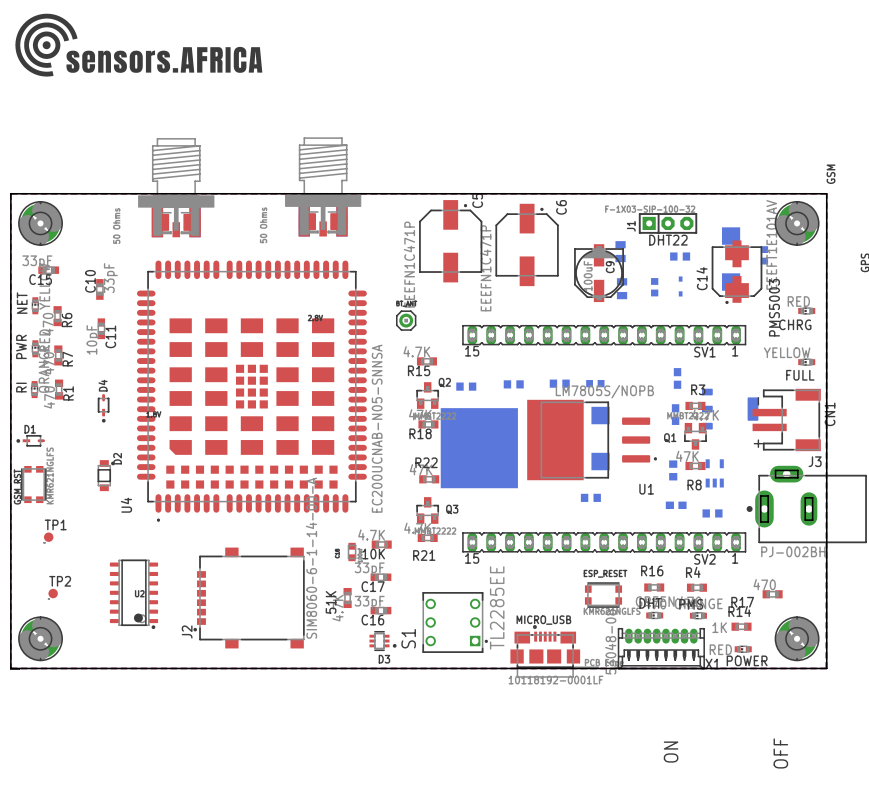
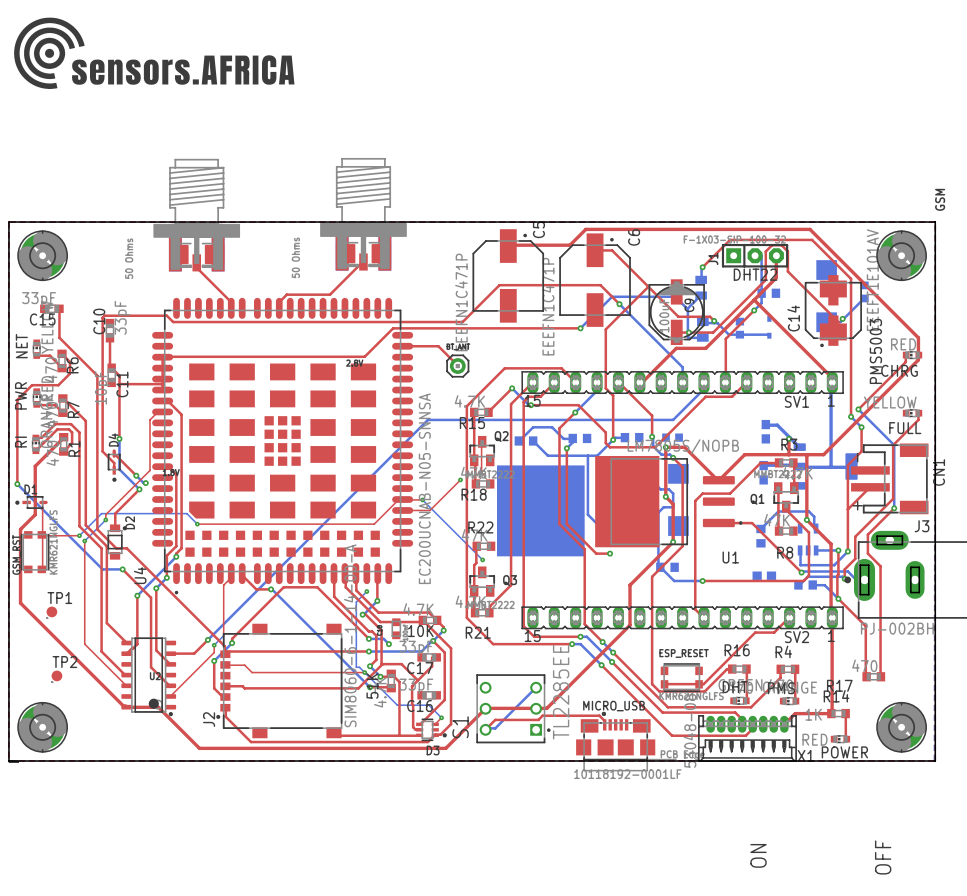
top track: none -> (508, 246) (570, 245) (585, 229) (810, 229) (918, 337) (918, 359) (823, 454) (744, 454) (718, 480) (684, 447) (665, 447) (665, 496) (673, 504) (673, 542) (630, 585) (630, 625) (546, 708) (485, 708) (445, 748) (199, 748) (158, 707) (123, 706) (20, 603) (20, 529) (35, 514) (35, 466) (63, 437)
top track: none -> (595, 250) (612, 250) (678, 316) (710, 316) (714, 320)
bottom track: none -> (755, 255) (761, 255) (761, 303) (754, 310)
top track: none -> (776, 255) (776, 277) (705, 348) (676, 348) (642, 382) (639, 382)
top track: none -> (363, 262) (330, 294) (286, 294) (279, 302) (279, 308)
top track: none -> (196, 262) (197, 268) (231, 302) (231, 308)
top track: none -> (702, 267) (730, 239) (812, 239) (851, 278) (851, 416)
bottom track: none -> (702, 267) (701, 279)
via: none -> (702, 267)
top track: none -> (648, 286) (605, 329) (605, 388) (613, 395) (613, 439)
bottom track: none -> (701, 295) (687, 308)
bottom track: none -> (864, 298) (840, 322) (826, 322)
top track: none -> (754, 299) (832, 377) (832, 382)
top track: none -> (619, 304) (600, 285) (499, 285) (462, 322) (173, 322) (166, 315) (104, 315) (102, 317) (102, 451) (114, 463) (114, 470)
bottom track: none -> (619, 304) (682, 367) (682, 382)
via: none -> (619, 304)
bottom track: none -> (687, 308) (687, 337) (702, 337)
bottom track: none -> (687, 308) (675, 296) (612, 296) (580, 328)
top track: none -> (59, 308) (59, 337) (97, 375) (97, 529) (116, 548) (126, 548) (224, 646) (225, 654) (225, 651) (368, 651)
top track: none -> (754, 310) (725, 338) (725, 382)
via: none -> (754, 310)
via: none -> (842, 318)
via: none -> (714, 320)
bottom track: none -> (702, 322) (717, 323) (728, 334) (769, 335)
top track: none -> (838, 322) (787, 271) (787, 251) (781, 245) (772, 245) (765, 251) (765, 279) (713, 332) (676, 332)
top track: none -> (580, 328) (393, 328) (364, 356) (163, 356) (162, 390)
via: none -> (580, 328)
via: none -> (688, 332)
top track: none -> (110, 337) (110, 366) (119, 375) (119, 438)
top track: none -> (402, 346) (438, 346) (457, 366)
top track: none -> (62, 353) (70, 362) (70, 373) (58, 385) (32, 385) (17, 399) (17, 484)
top track: none -> (906, 355) (905, 362) (858, 409)
top track: none -> (36, 355) (50, 355) (62, 368)
top track: none -> (532, 382) (511, 404) (511, 585) (490, 606) (489, 612)
top track: none -> (554, 382) (540, 396) (528, 396) (523, 402) (523, 626) (534, 636) (580, 636)
top track: none -> (575, 382) (561, 368) (504, 368) (466, 406) (466, 617) (493, 644) (572, 644)
bottom track: none -> (597, 382) (596, 391) (575, 412)
top track: none -> (618, 382) (652, 415) (652, 436)
bottom track: none -> (704, 382) (703, 389) (673, 419) (427, 419) (207, 639)
top track: none -> (746, 382) (732, 396) (705, 396) (655, 447) (610, 447) (605, 443) (605, 432) (578, 405) (531, 405)
bottom track: none -> (832, 382) (831, 467)
top track: none -> (119, 384) (162, 384)
top track: none -> (512, 388) (488, 412)
bottom track: none -> (512, 388) (531, 405)
via: none -> (512, 388)
top track: none -> (62, 398) (85, 420) (85, 525) (106, 546) (106, 623) (126, 643)
top track: none -> (162, 400) (167, 400) (181, 414) (181, 548) (176, 553) (176, 556)
top track: none -> (36, 404) (55, 405) (62, 412)
via: none -> (531, 405)
bottom track: none -> (858, 409) (894, 445) (894, 508)
via: none -> (858, 409)
top track: none -> (162, 411) (157, 412) (150, 419) (150, 470) (105, 514) (105, 519)
top track: none -> (474, 412) (475, 483)
top track: none -> (575, 412) (559, 428) (559, 524) (584, 549) (584, 624) (602, 642)
via: none -> (575, 412)
top track: none -> (918, 413) (918, 419) (893, 445) (893, 498) (855, 536) (855, 558) (844, 569) (844, 578)
bottom track: none -> (851, 416) (861, 427)
via: none -> (851, 416)
bottom track: none -> (765, 424) (777, 425) (799, 447)
top track: none -> (861, 427) (861, 451) (847, 465) (847, 551)
via: none -> (861, 427)
bottom track: none -> (652, 436) (653, 446) (661, 454) (670, 454) (673, 457)
via: none -> (652, 436)
bottom track: none -> (624, 437) (615, 437) (597, 455) (547, 455) (533, 440)
top track: none -> (35, 438) (41, 437) (55, 424) (71, 424) (79, 432) (79, 526) (101, 548) (101, 651) (126, 675)
bottom track: none -> (119, 438) (119, 469) (139, 489)
via: none -> (119, 438)
top track: none -> (788, 438) (788, 454)
via: none -> (788, 438)
via: none -> (613, 439)
bottom track: none -> (518, 440) (533, 427) (552, 427) (563, 438) (572, 438) (573, 442) (566, 448)
top track: none -> (482, 441) (481, 470)
via: none -> (665, 447)
top track: none -> (566, 448) (566, 524) (596, 553) (610, 553)
via: none -> (566, 448)
top track: none -> (35, 450) (57, 429) (68, 429) (72, 432) (72, 443) (63, 451)
top track: none -> (114, 453) (136, 475)
top track: none -> (806, 454) (806, 519) (831, 544) (832, 712) (795, 713) (784, 724)
bottom track: none -> (587, 455) (587, 514) (596, 523) (607, 523) (610, 525)
top track: none -> (673, 457) (682, 467) (682, 546) (652, 576) (652, 684) (659, 691) (704, 691) (726, 669) (732, 669)
via: none -> (673, 457)
top track: none -> (779, 462) (760, 463) (730, 493) (702, 493) (695, 500) (695, 609) (704, 617)
top track: none -> (793, 462) (794, 488)
bottom track: none -> (763, 465) (851, 466)
top track: none -> (162, 466) (168, 467) (176, 474) (176, 546) (166, 555) (166, 577)
bottom track: none -> (136, 475) (145, 483)
via: none -> (136, 475)
top track: none -> (460, 479) (430, 510) (402, 510)
via: none -> (460, 479)
bottom track: none -> (610, 482) (612, 484) (655, 484) (660, 489) (668, 489) (673, 493) (673, 507) (663, 507) (658, 512) (658, 566) (674, 580) (702, 580)
via: none -> (145, 483)
bottom track: none -> (17, 484) (102, 569) (122, 569)
via: none -> (17, 484)
top track: none -> (870, 487) (847, 509)
top track: none -> (778, 488) (779, 531)
top track: none -> (139, 489) (115, 513) (115, 528)
via: none -> (139, 489)
via: none -> (665, 496)
top track: none -> (422, 499) (398, 499) (374, 524) (197, 524)
bottom track: none -> (422, 499) (482, 559)
via: none -> (422, 499)
top track: none -> (43, 502) (42, 535)
top track: none -> (786, 506) (786, 510) (808, 532) (808, 575) (803, 580) (702, 580)
top track: none -> (894, 508) (867, 534) (867, 553) (880, 566) (880, 676)
via: none -> (894, 508)
bottom track: none -> (105, 519) (84, 540)
via: none -> (105, 519)
via: none -> (806, 519)
top track: none -> (718, 523) (752, 523) (801, 572)
bottom track: none -> (197, 524) (186, 513) (101, 513) (79, 535)
via: none -> (197, 524)
bottom track: none -> (816, 528) (814, 528) (814, 516) (808, 511) (778, 511) (760, 528)
top track: none -> (42, 535) (41, 569)
top track: none -> (42, 535) (79, 535)
via: none -> (79, 535)
top track: none -> (84, 540) (84, 644) (126, 685)
via: none -> (84, 540)
via: none -> (673, 542)
top track: none -> (476, 546) (476, 563) (474, 565) (475, 612)
bottom track: none -> (800, 550) (800, 565) (834, 565) (847, 551)
bottom track: none -> (816, 550) (838, 550)
top track: none -> (838, 550) (837, 598) (865, 626) (866, 676)
via: none -> (838, 550)
via: none -> (847, 551)
via: none -> (610, 553)
bottom track: none -> (176, 556) (137, 595)
via: none -> (176, 556)
via: none -> (482, 559)
top track: none -> (122, 569) (151, 597) (151, 667) (170, 685)
via: none -> (122, 569)
bottom track: none -> (801, 572) (847, 571) (856, 579) (864, 579)
via: none -> (801, 572)
top track: none -> (231, 573) (231, 577) (223, 585) (223, 635)
top track: none -> (242, 573) (256, 589) (271, 589)
top track: none -> (334, 573) (334, 596) (368, 631) (372, 631) (376, 635) (376, 659) (370, 666)
top track: none -> (344, 573) (345, 587) (380, 622) (423, 622) (422, 620) (451, 648) (451, 724) (440, 734) (435, 734) (427, 742) (251, 742) (225, 716) (225, 707)
top track: none -> (355, 573) (356, 590) (378, 612) (428, 612) (443, 627) (443, 630)
top track: none -> (377, 573) (377, 600)
bottom track: none -> (166, 577) (156, 588)
via: none -> (166, 577)
bottom track: none -> (844, 578) (842, 576) (807, 576) (798, 584)
via: none -> (844, 578)
via: none -> (702, 580)
bottom track: none -> (812, 584) (824, 585) (838, 598)
top track: none -> (156, 588) (156, 650) (170, 664)
via: none -> (156, 588)
bottom track: none -> (271, 589) (370, 687)
via: none -> (271, 589)
bottom track: none -> (366, 591) (356, 602) (356, 667) (359, 667) (397, 705) (428, 705) (441, 717)
via: none -> (366, 591)
top track: none -> (137, 595) (137, 644) (126, 653)
via: none -> (137, 595)
via: none -> (838, 598)
bottom track: none -> (377, 600) (362, 614)
via: none -> (377, 600)
top track: none -> (362, 614) (365, 614) (381, 630) (382, 664)
via: none -> (362, 614)
top track: none -> (789, 617) (774, 632) (755, 632) (703, 684) (664, 684)
bottom track: none -> (443, 630) (421, 651) (368, 651)
via: none -> (443, 630)
bottom track: none -> (223, 635) (214, 645)
bottom track: none -> (580, 636) (586, 636) (612, 662)
via: none -> (580, 636)
top track: none -> (368, 638) (317, 587) (283, 587) (232, 638) (232, 643)
bottom track: none -> (368, 638) (383, 638) (388, 644)
via: none -> (368, 638)
top track: none -> (207, 639) (194, 653) (170, 653)
via: none -> (207, 639)
top track: none -> (433, 640) (444, 652) (444, 699) (419, 724)
via: none -> (433, 640)
bottom track: none -> (602, 642) (613, 652)
via: none -> (602, 642)
bottom track: none -> (232, 643) (214, 660)
via: none -> (232, 643)
via: none -> (388, 644)
bottom track: none -> (572, 644) (580, 644) (601, 665)
via: none -> (572, 644)
top track: none -> (214, 645) (214, 652) (170, 696)
via: none -> (214, 645)
via: none -> (368, 651)
top track: none -> (613, 652) (667, 707) (751, 707) (780, 677) (780, 669)
via: none -> (613, 652)
top track: none -> (436, 657) (432, 657) (432, 666) (412, 686) (413, 727) (419, 729)
top track: none -> (214, 660) (214, 688) (225, 697)
via: none -> (214, 660)
top track: none -> (612, 662) (662, 712) (735, 712) (741, 718) (742, 724)
via: none -> (612, 662)
top track: none -> (225, 664) (244, 665) (252, 672) (364, 672)
top track: none -> (601, 665) (672, 735) (745, 735) (752, 729) (752, 724)
via: none -> (601, 665)
bottom track: none -> (370, 666) (380, 676)
via: none -> (370, 666)
top track: none -> (746, 669) (746, 700)
top track: none -> (795, 669) (795, 701)
via: none -> (364, 672)
top track: none -> (380, 676) (393, 676) (391, 673) (399, 682) (399, 735)
via: none -> (380, 676)
top track: none -> (417, 680) (401, 664) (382, 664) (358, 688) (244, 688) (242, 686) (225, 686)
top track: none -> (370, 687) (391, 688)
via: none -> (370, 687)
bottom track: none -> (536, 687) (495, 728) (485, 729)
top track: none -> (845, 713) (846, 739)
top track: none -> (441, 717) (435, 724)
via: none -> (441, 717)
top track: none -> (604, 724) (604, 720) (599, 715) (542, 715) (538, 719) (495, 719) (485, 729)
top track: none -> (334, 732) (336, 735) (419, 735)

